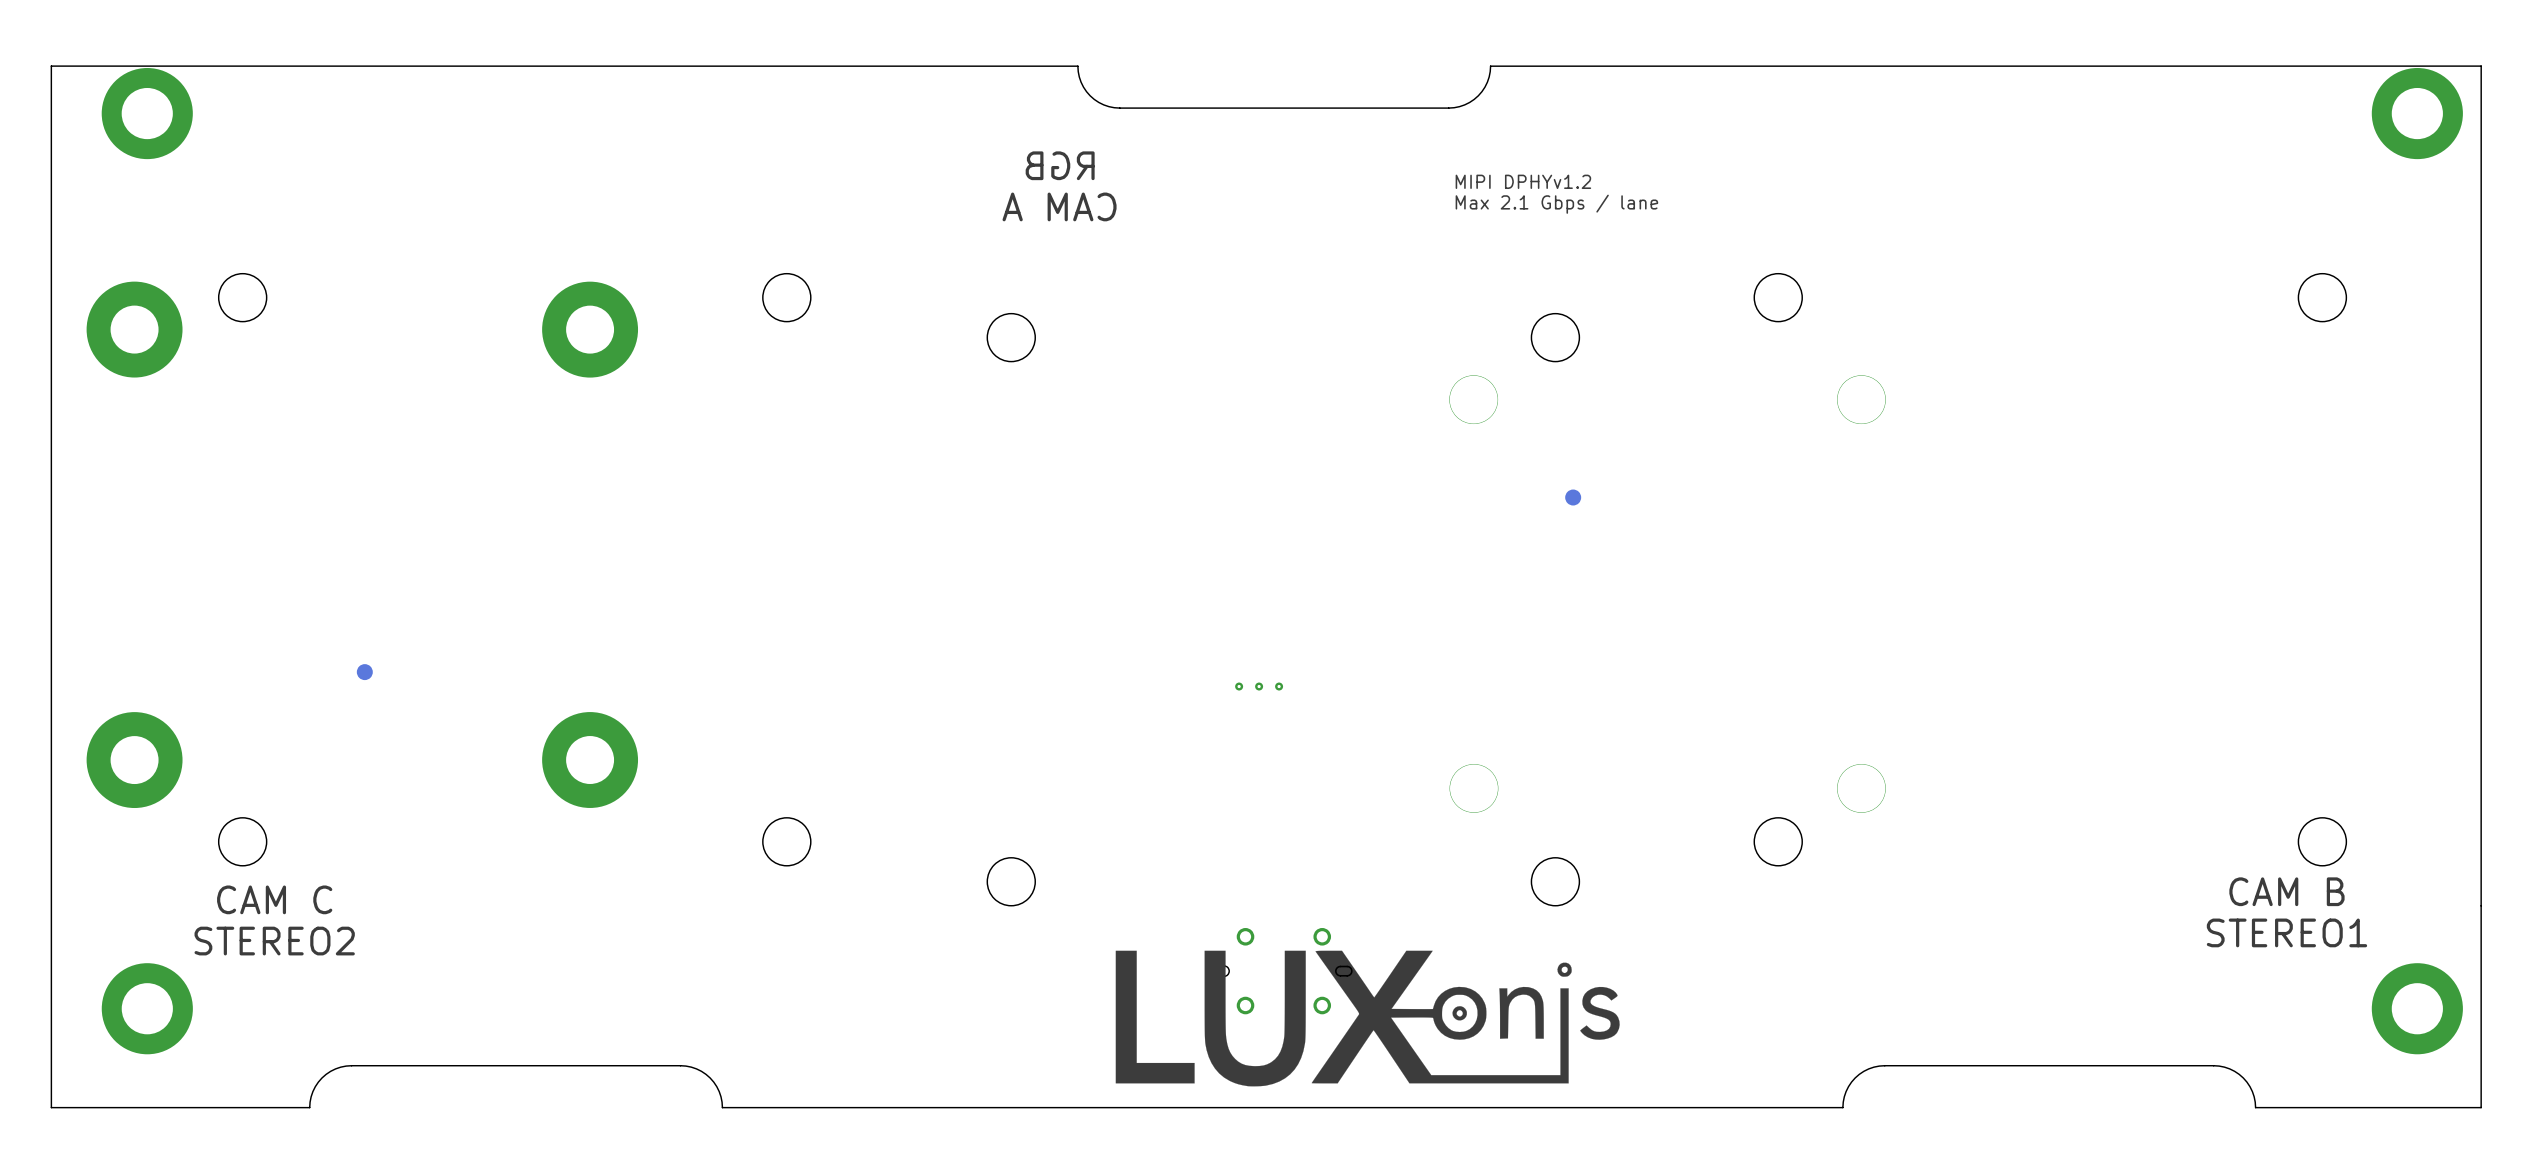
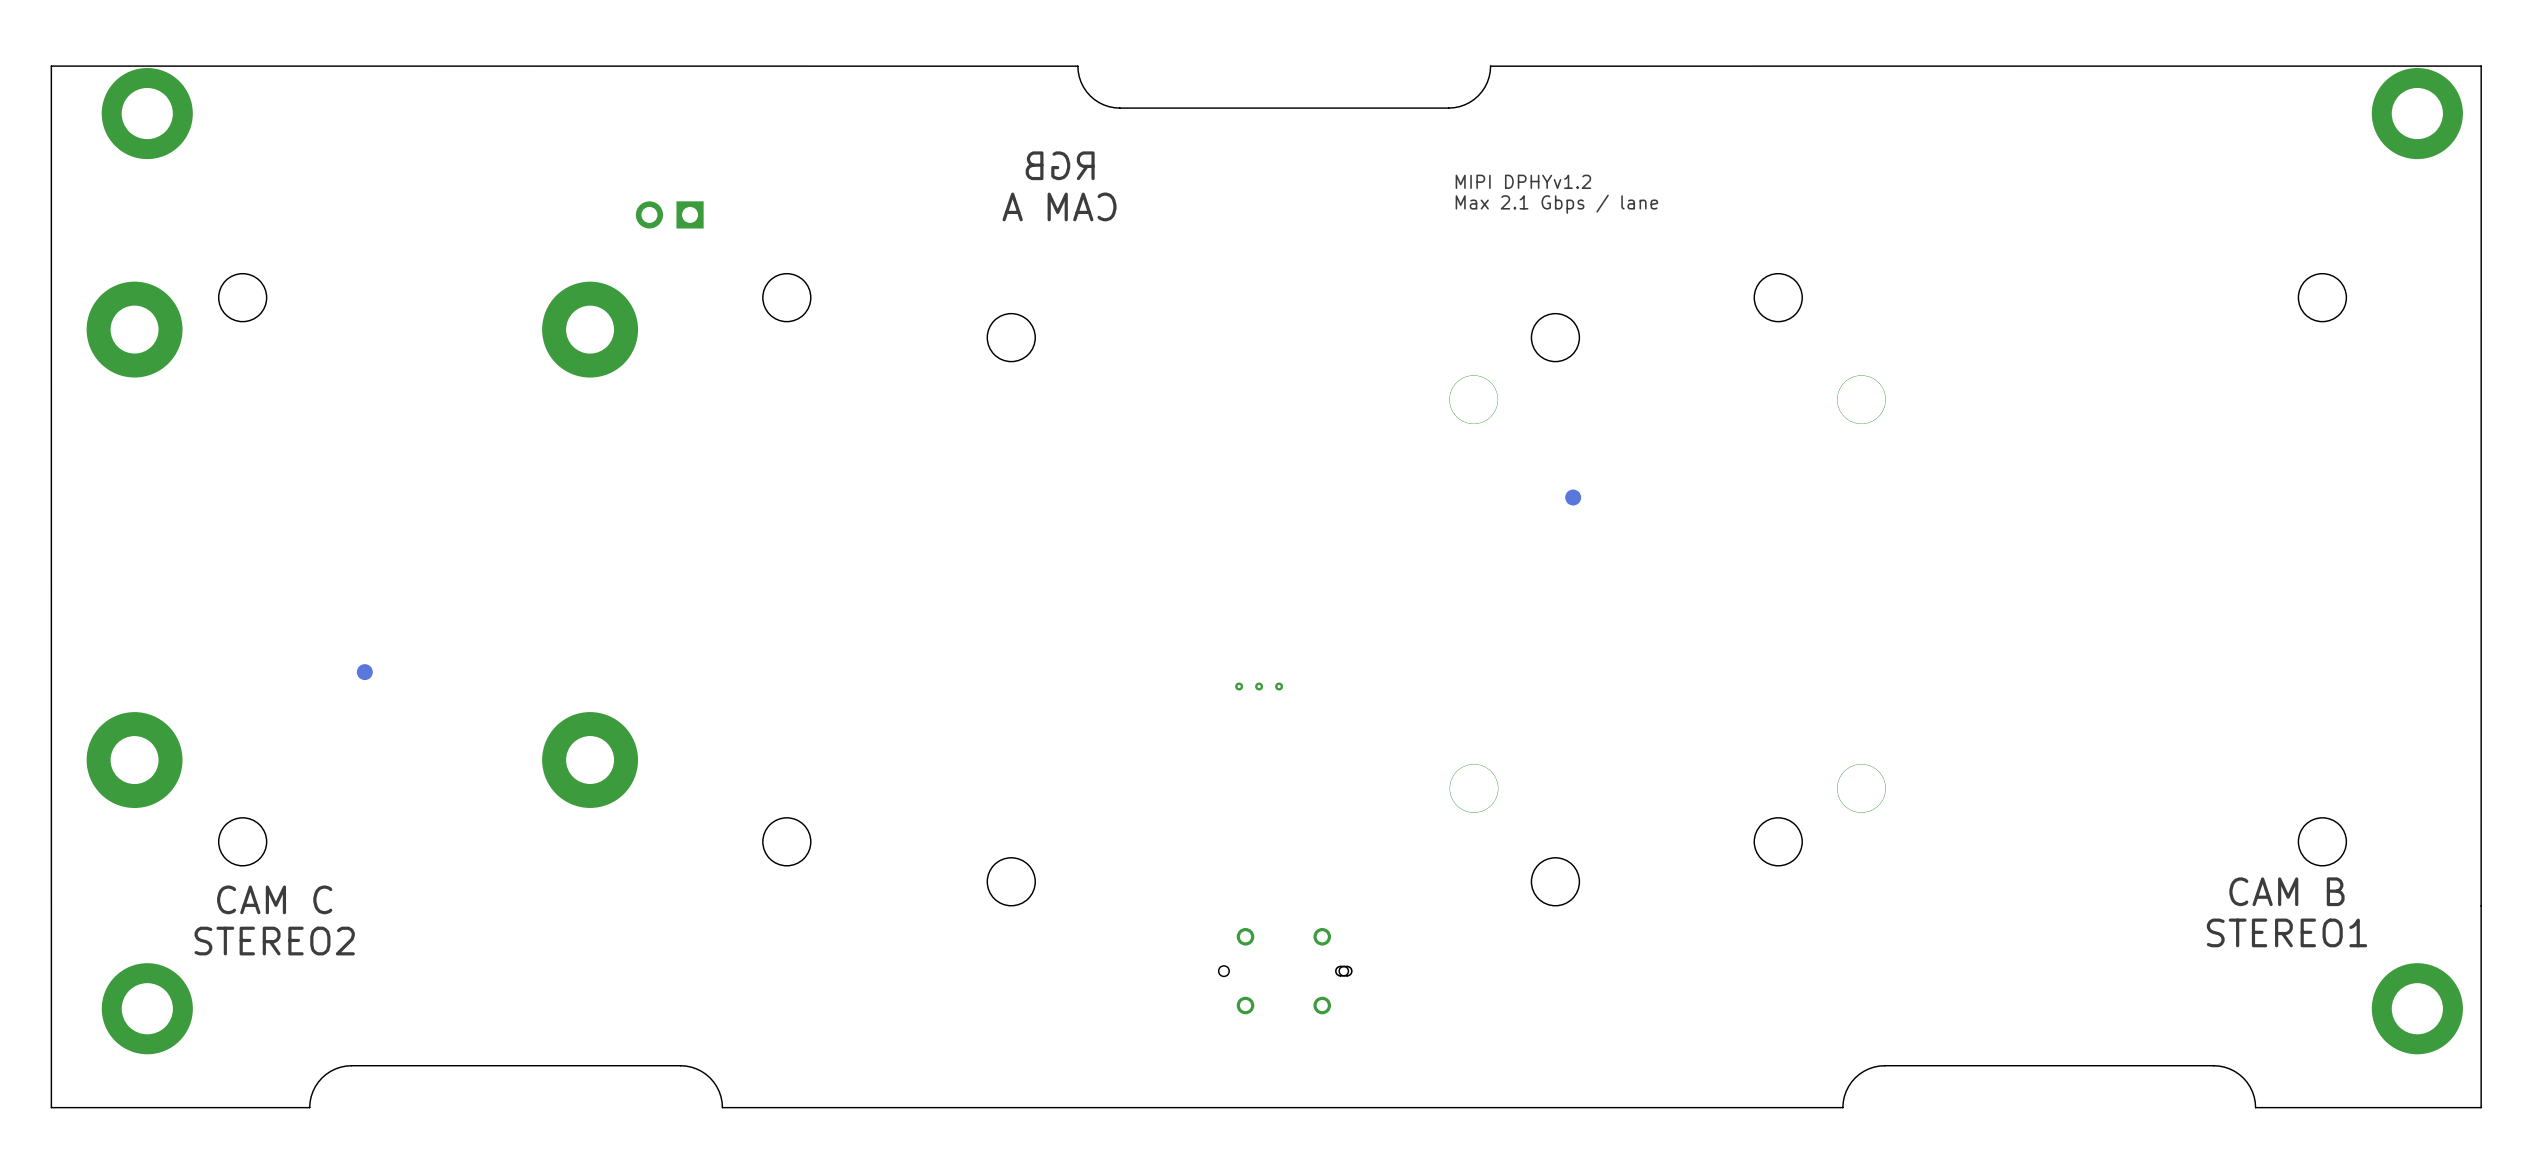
part: none -> (669, 214)
drawing: [1115, 950, 1620, 1087] -> none

